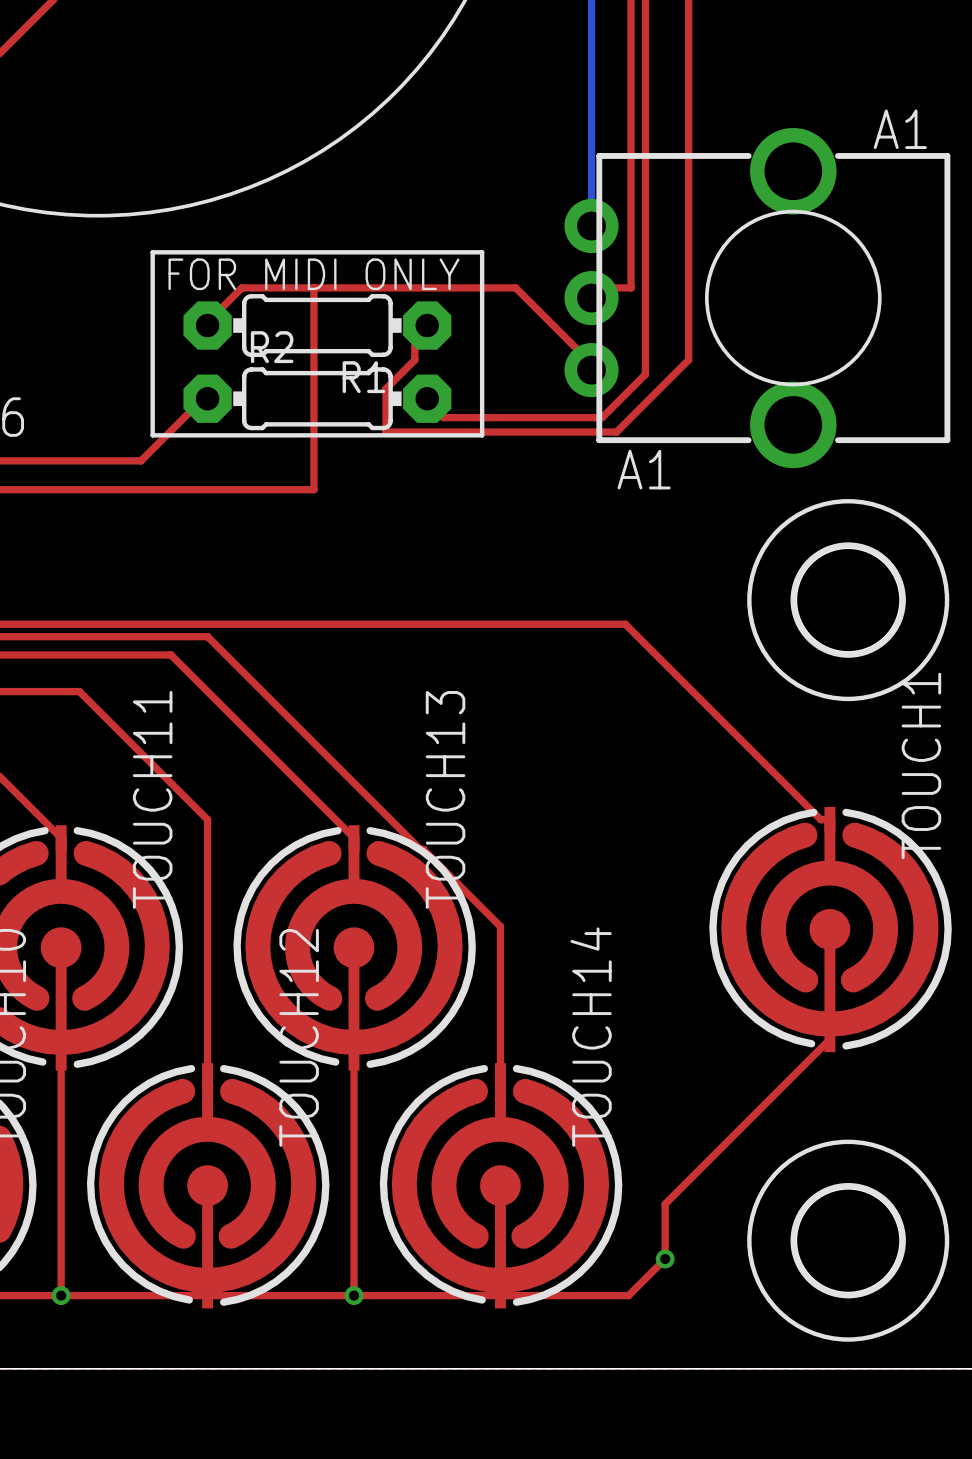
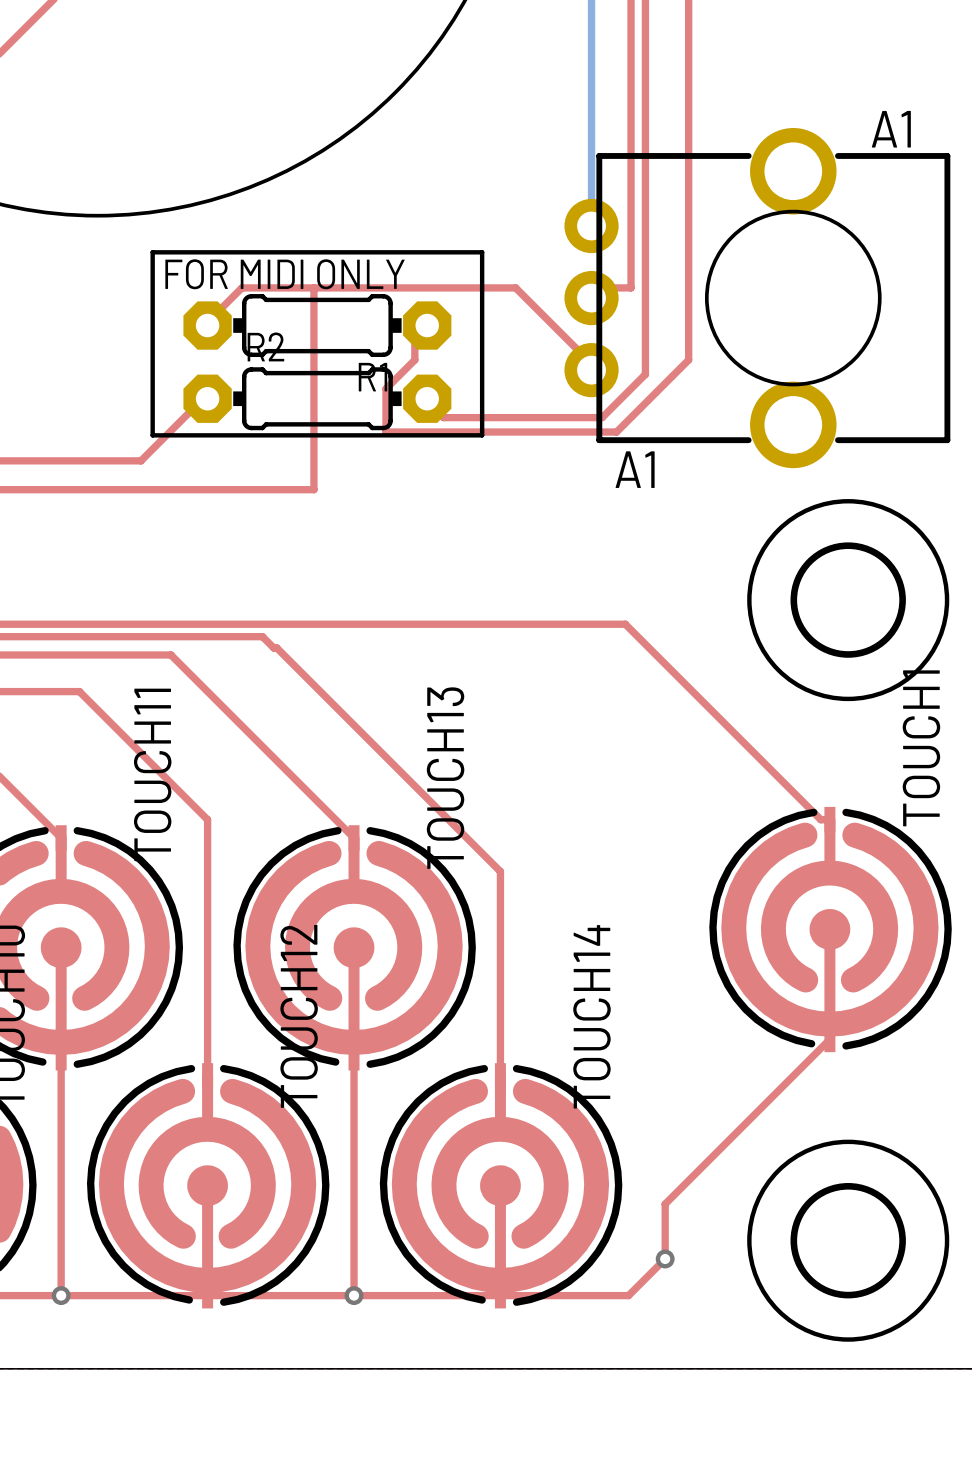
top track: (207, 636) (420, 849) (423, 849) (500, 926) -> (207, 636) (262, 636) (273, 648) (276, 648) (500, 871) (500, 926)

